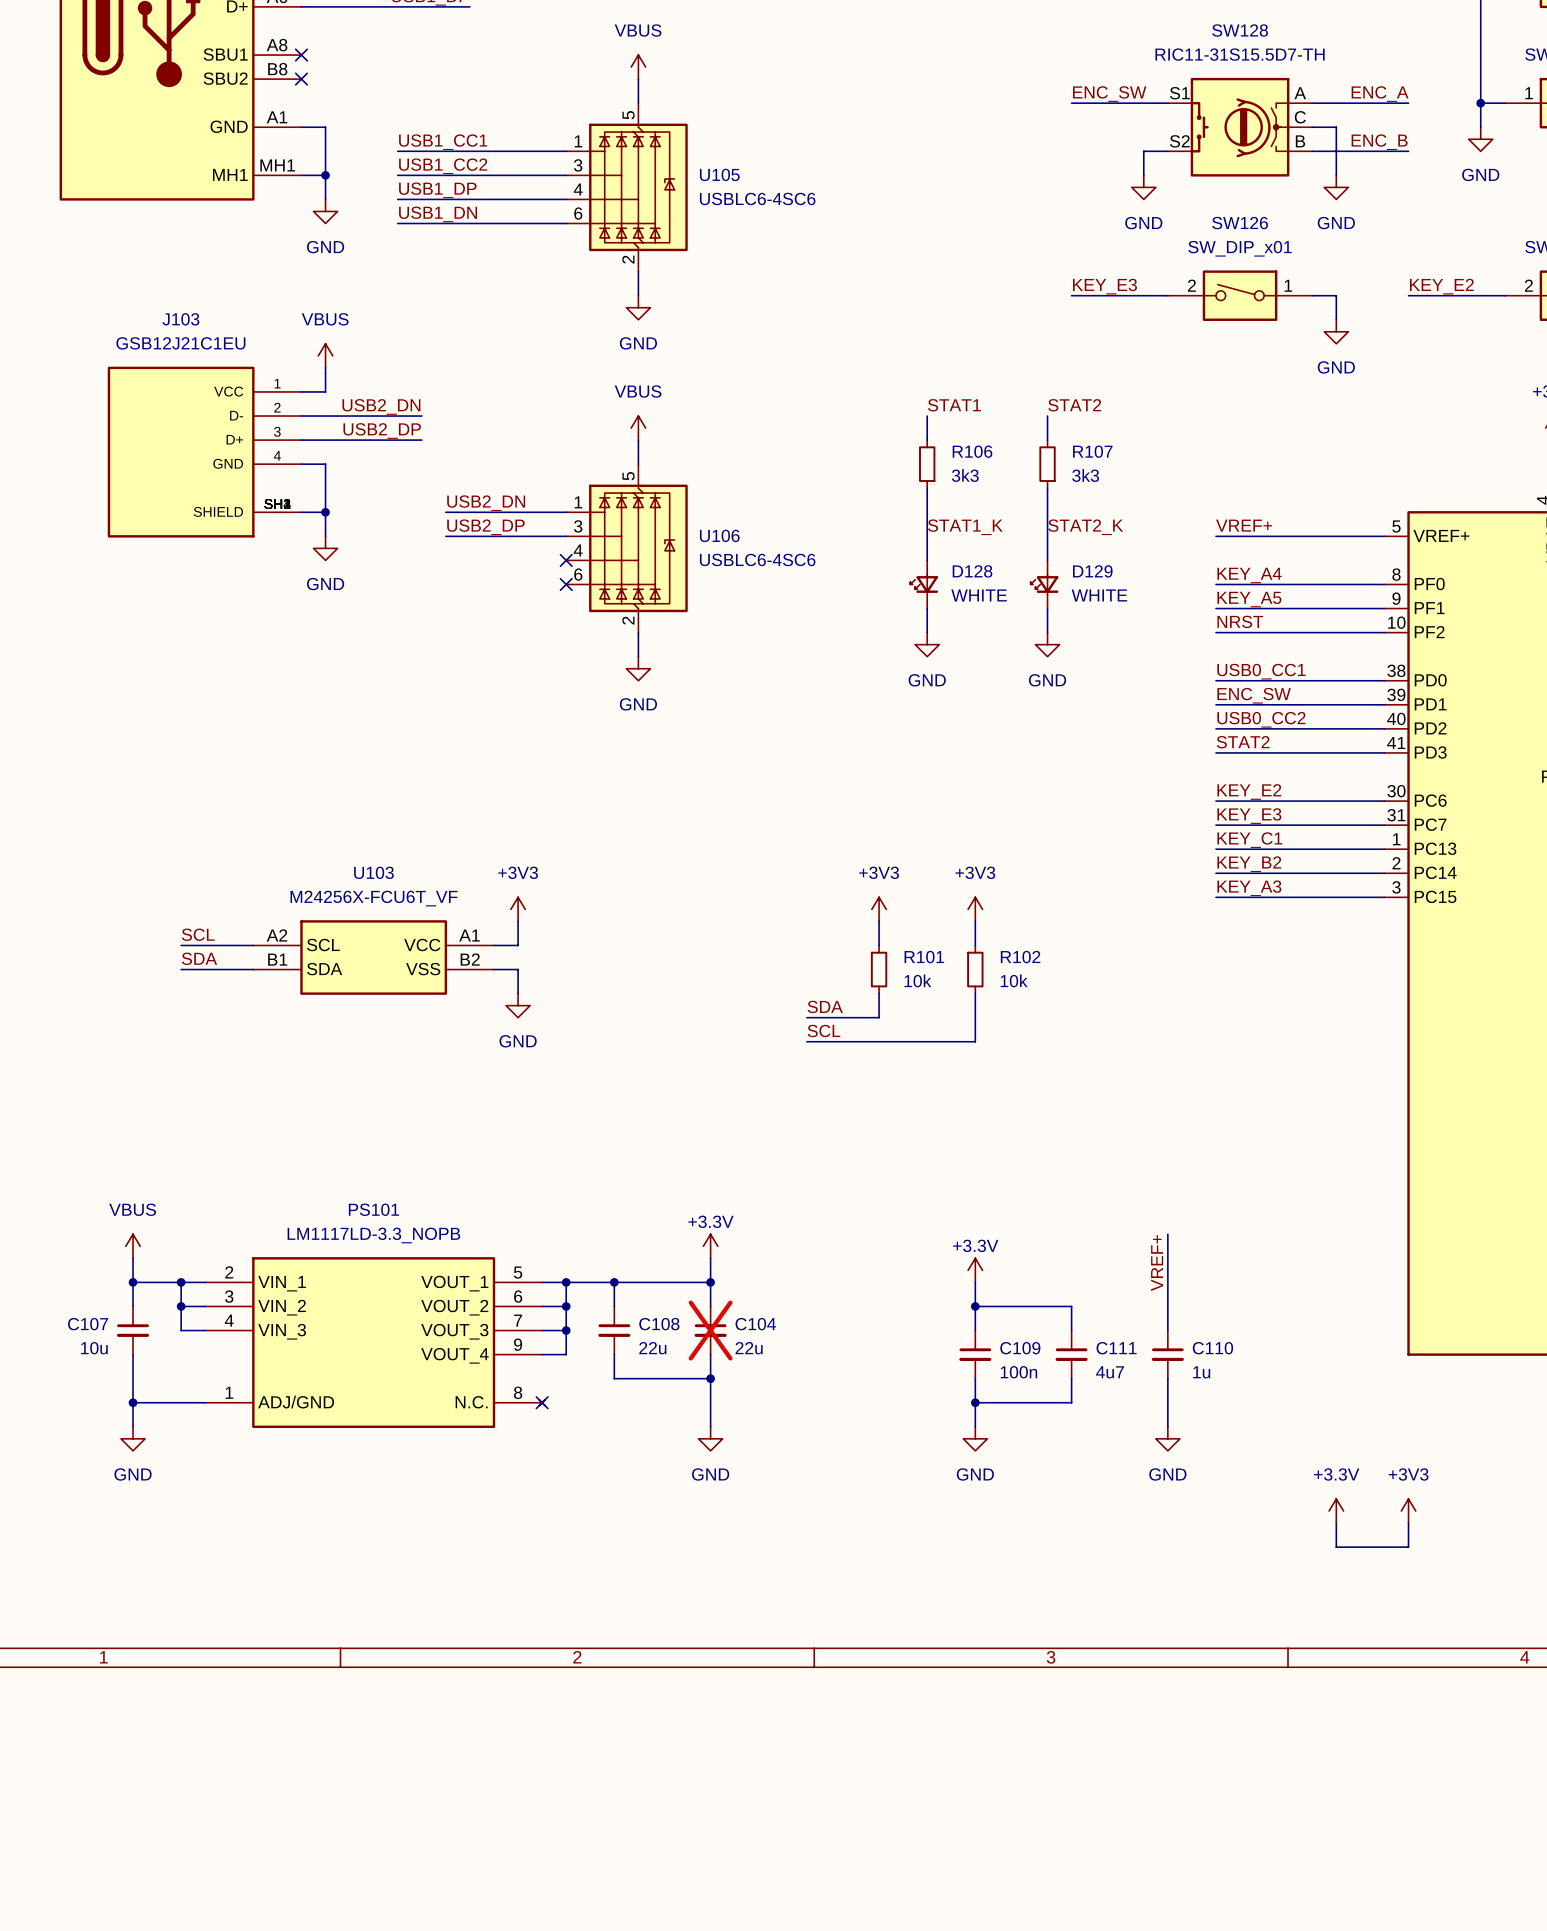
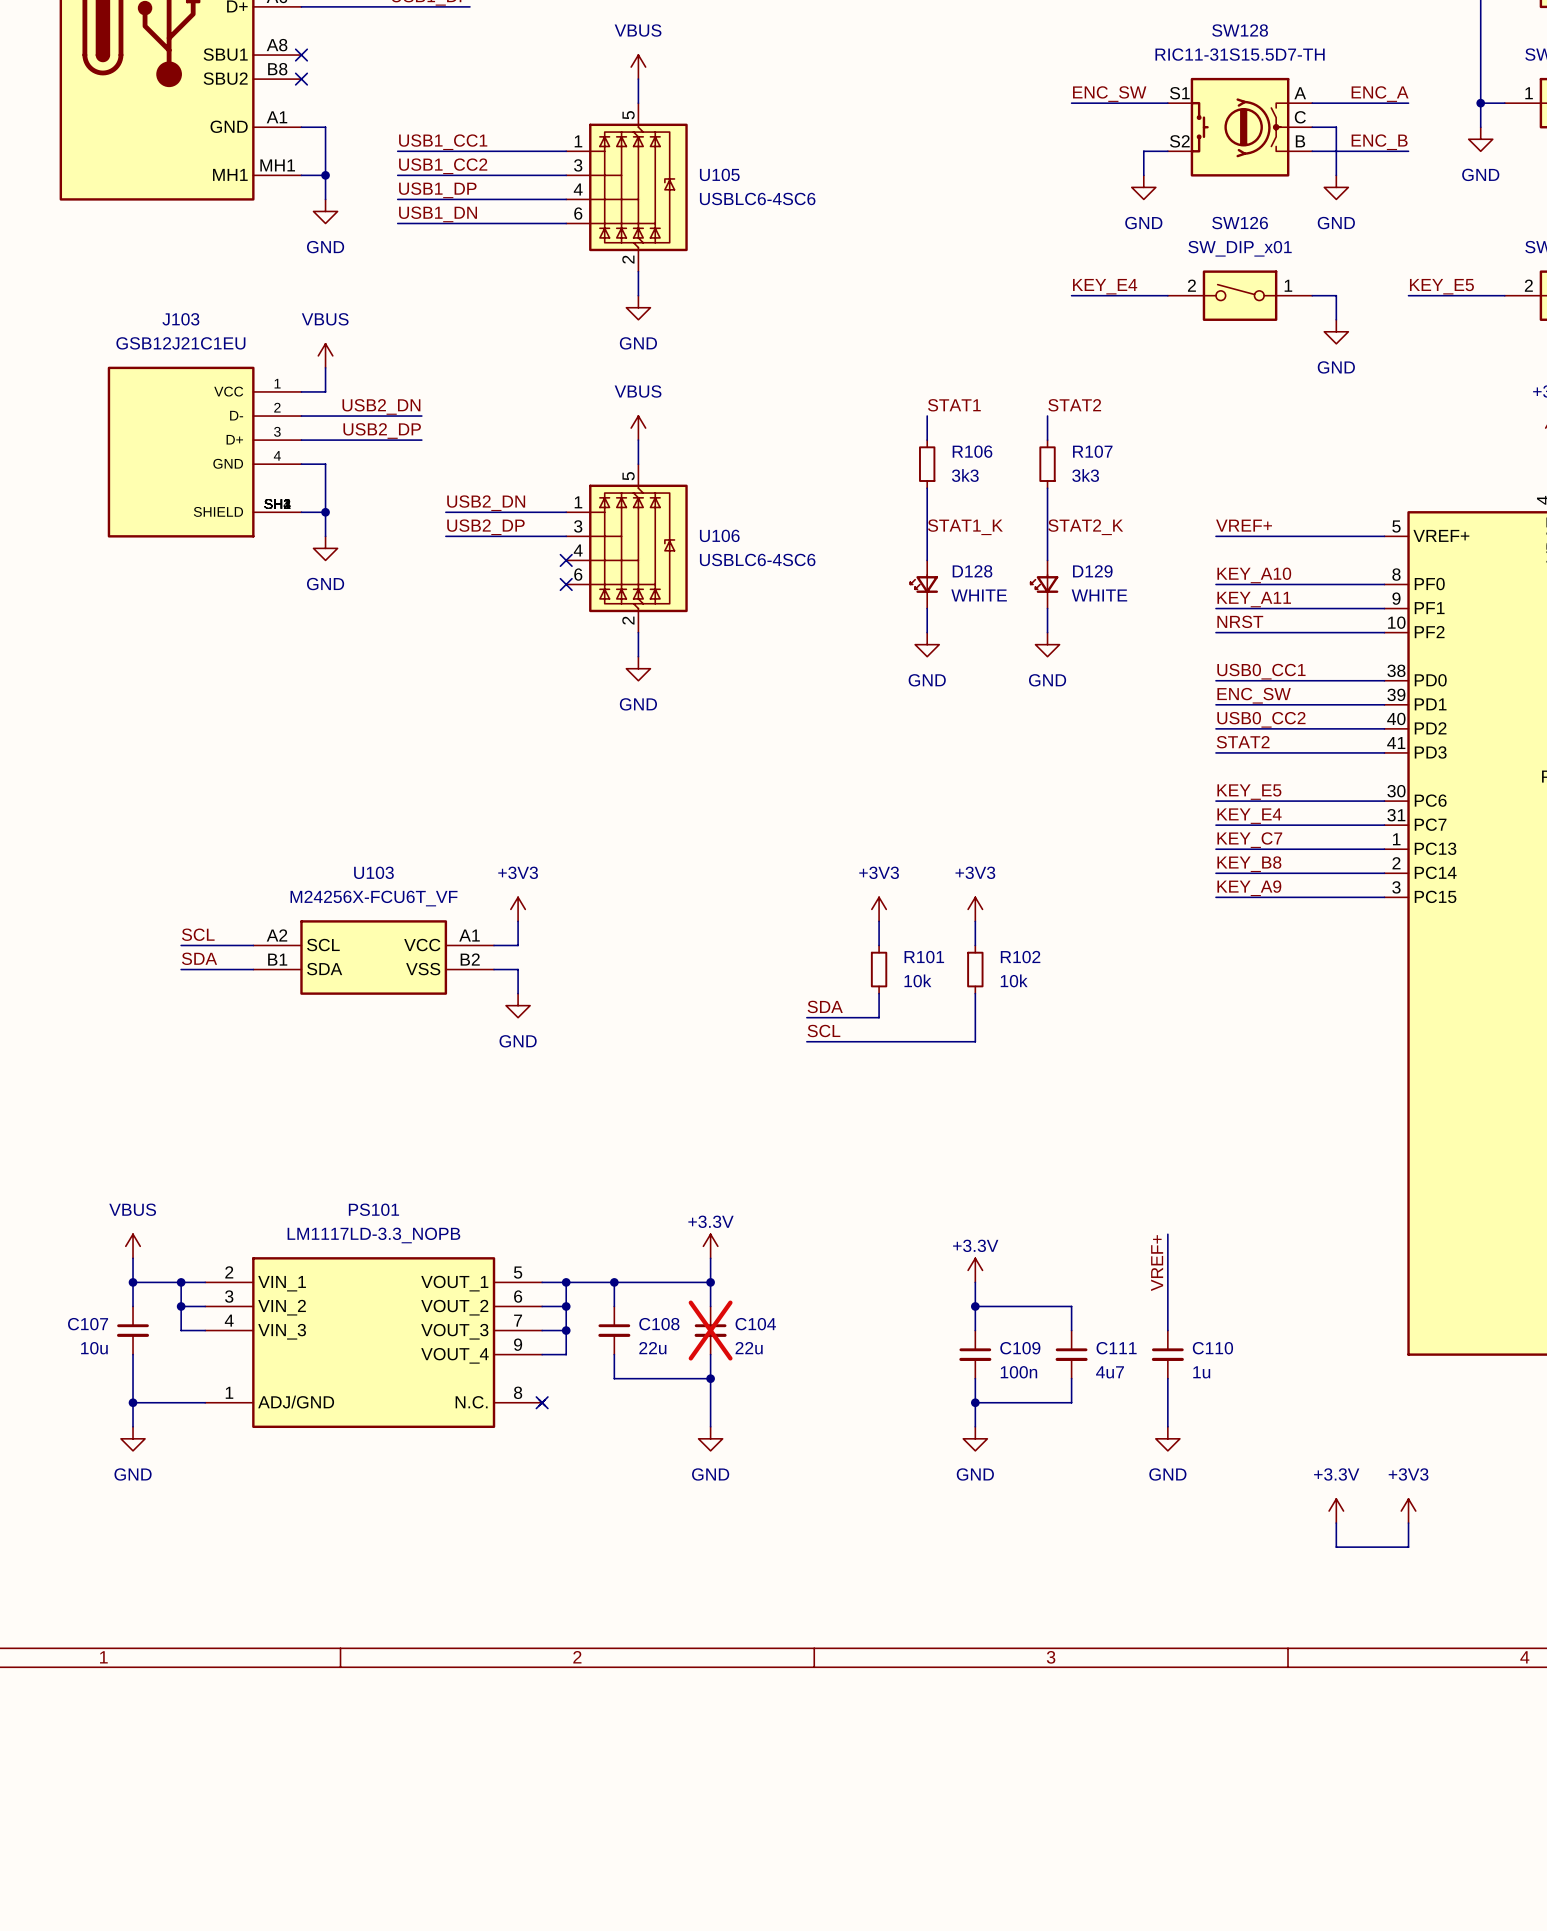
label: KEY_E3 (1104, 286) -> KEY_E4 (1105, 286)
label: KEY_E2 (1441, 286) -> KEY_E5 (1441, 286)
label: KEY_A4 (1249, 575) -> KEY_A10 (1254, 575)
label: KEY_A5 (1249, 599) -> KEY_A11 (1254, 599)
label: KEY_E2 (1249, 791) -> KEY_E5 (1249, 792)
label: KEY_E3 (1249, 816) -> KEY_E4 (1249, 816)
label: KEY_C1 (1249, 840) -> KEY_C7 (1249, 840)
label: KEY_B2 (1249, 864) -> KEY_B8 (1249, 864)
label: KEY_A3 (1249, 888) -> KEY_A9 (1249, 888)

